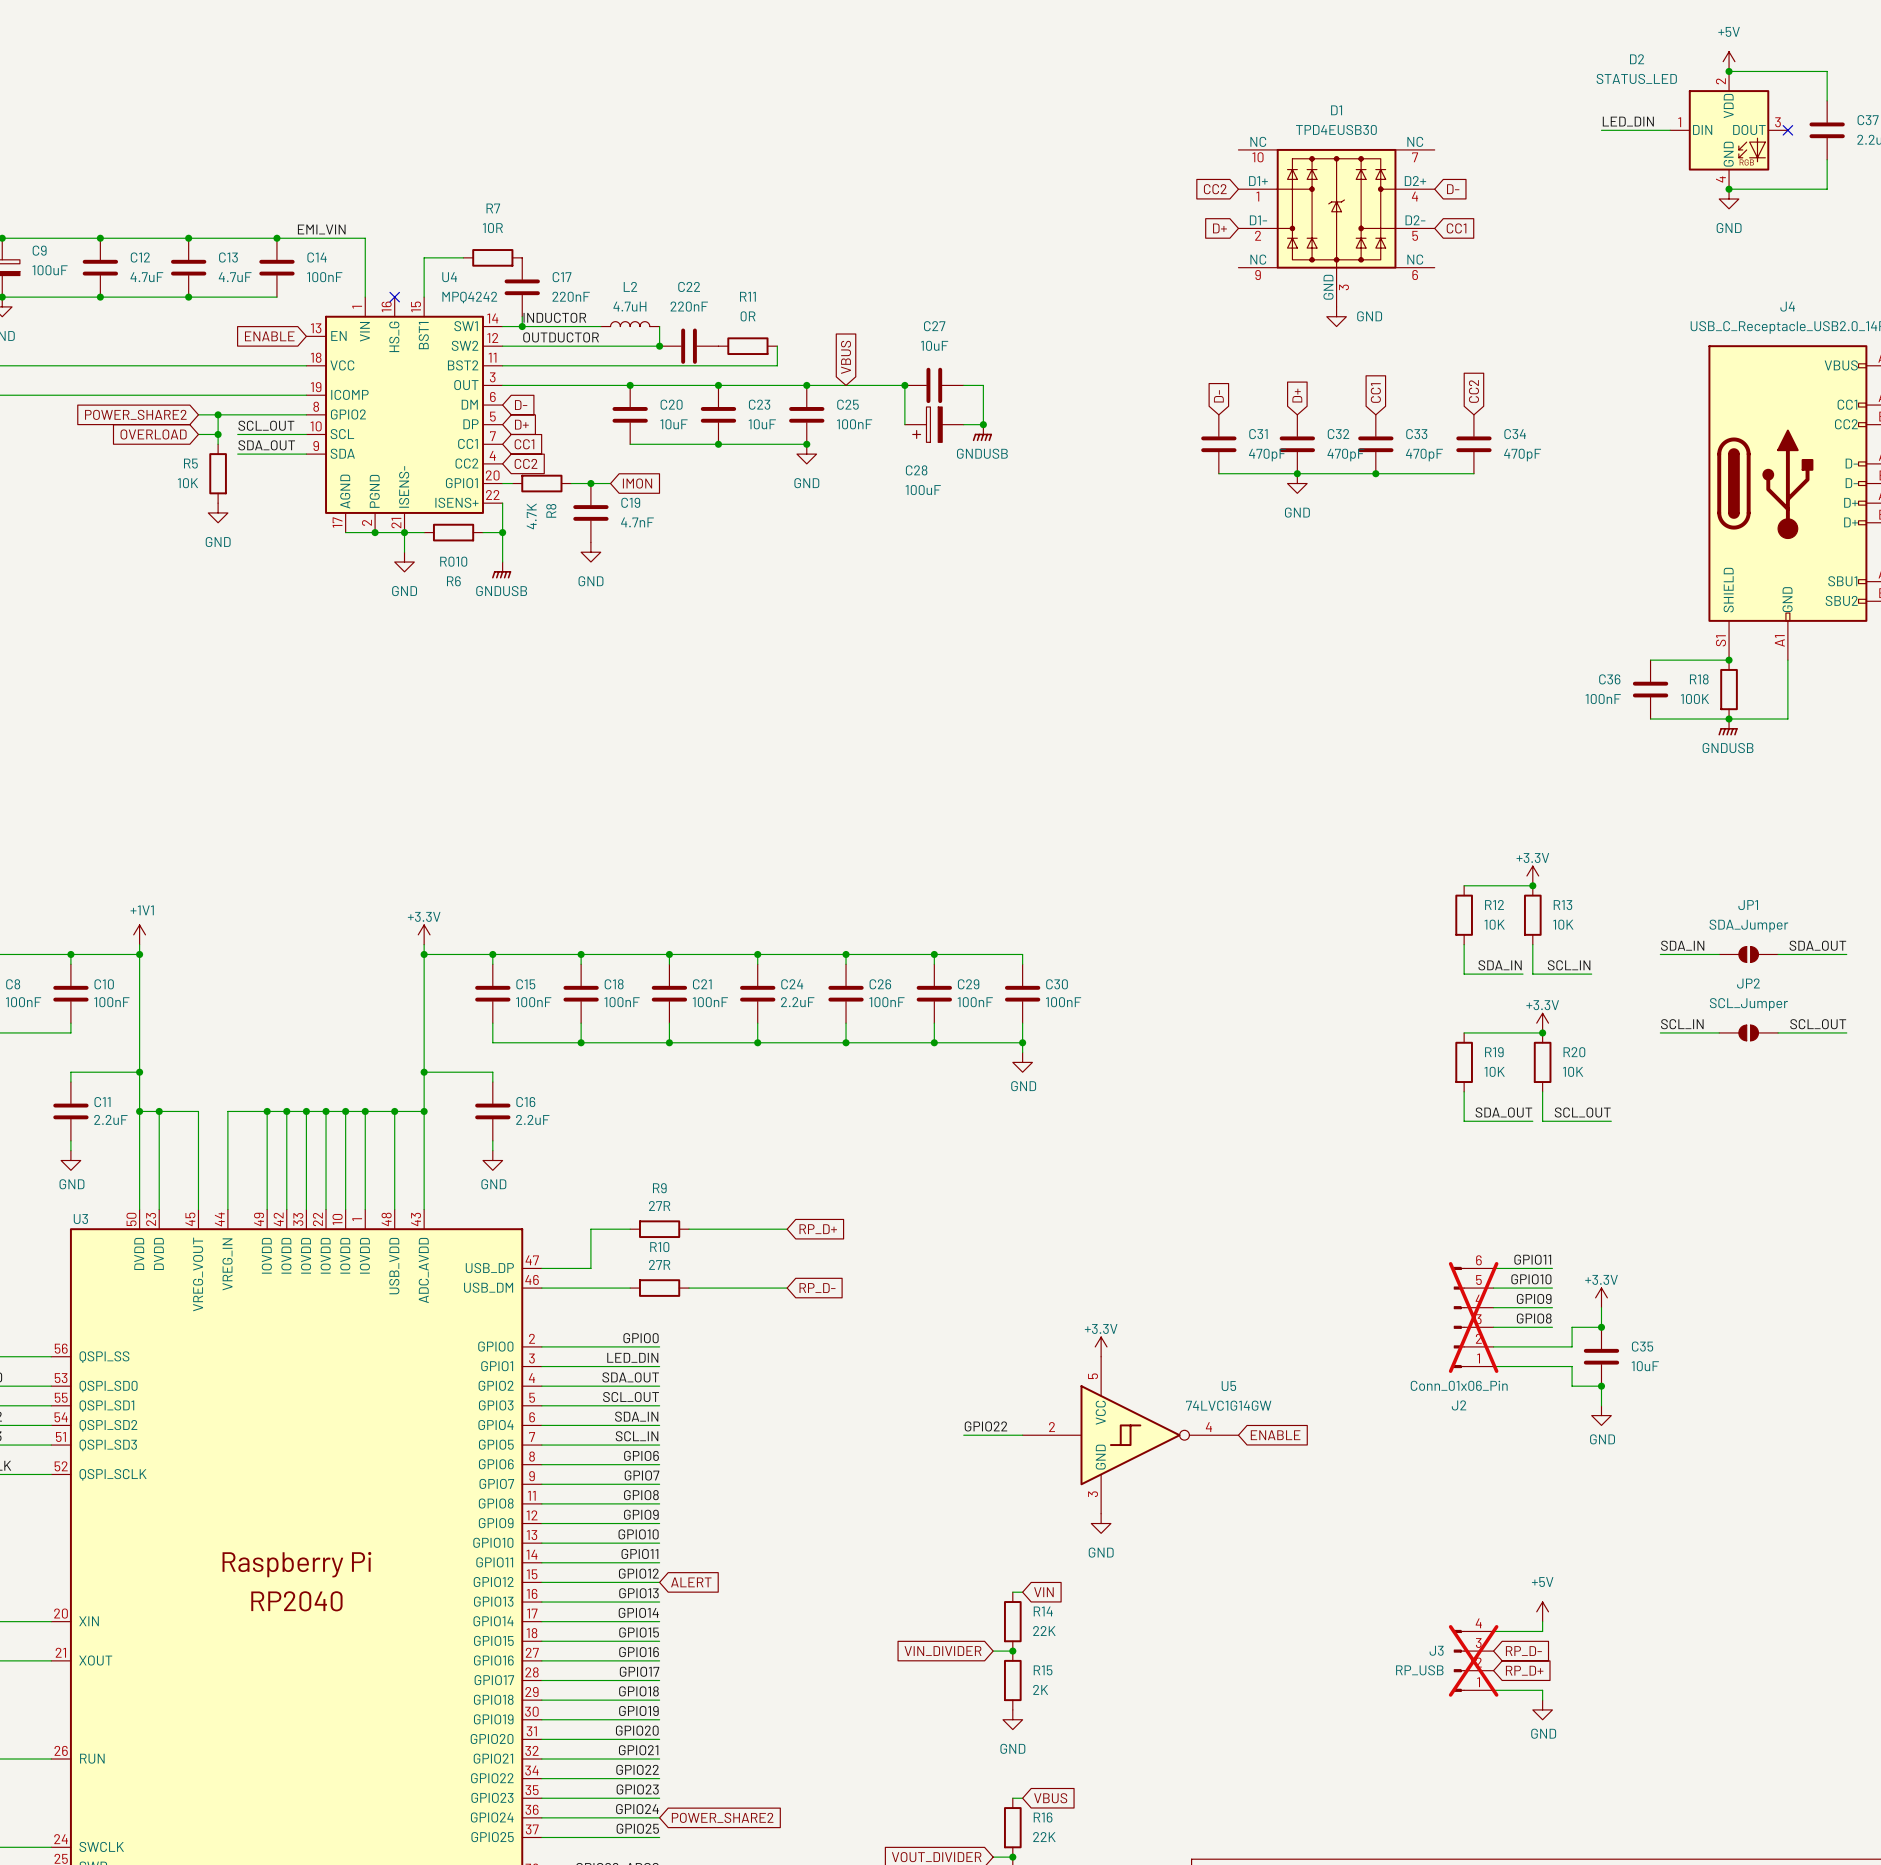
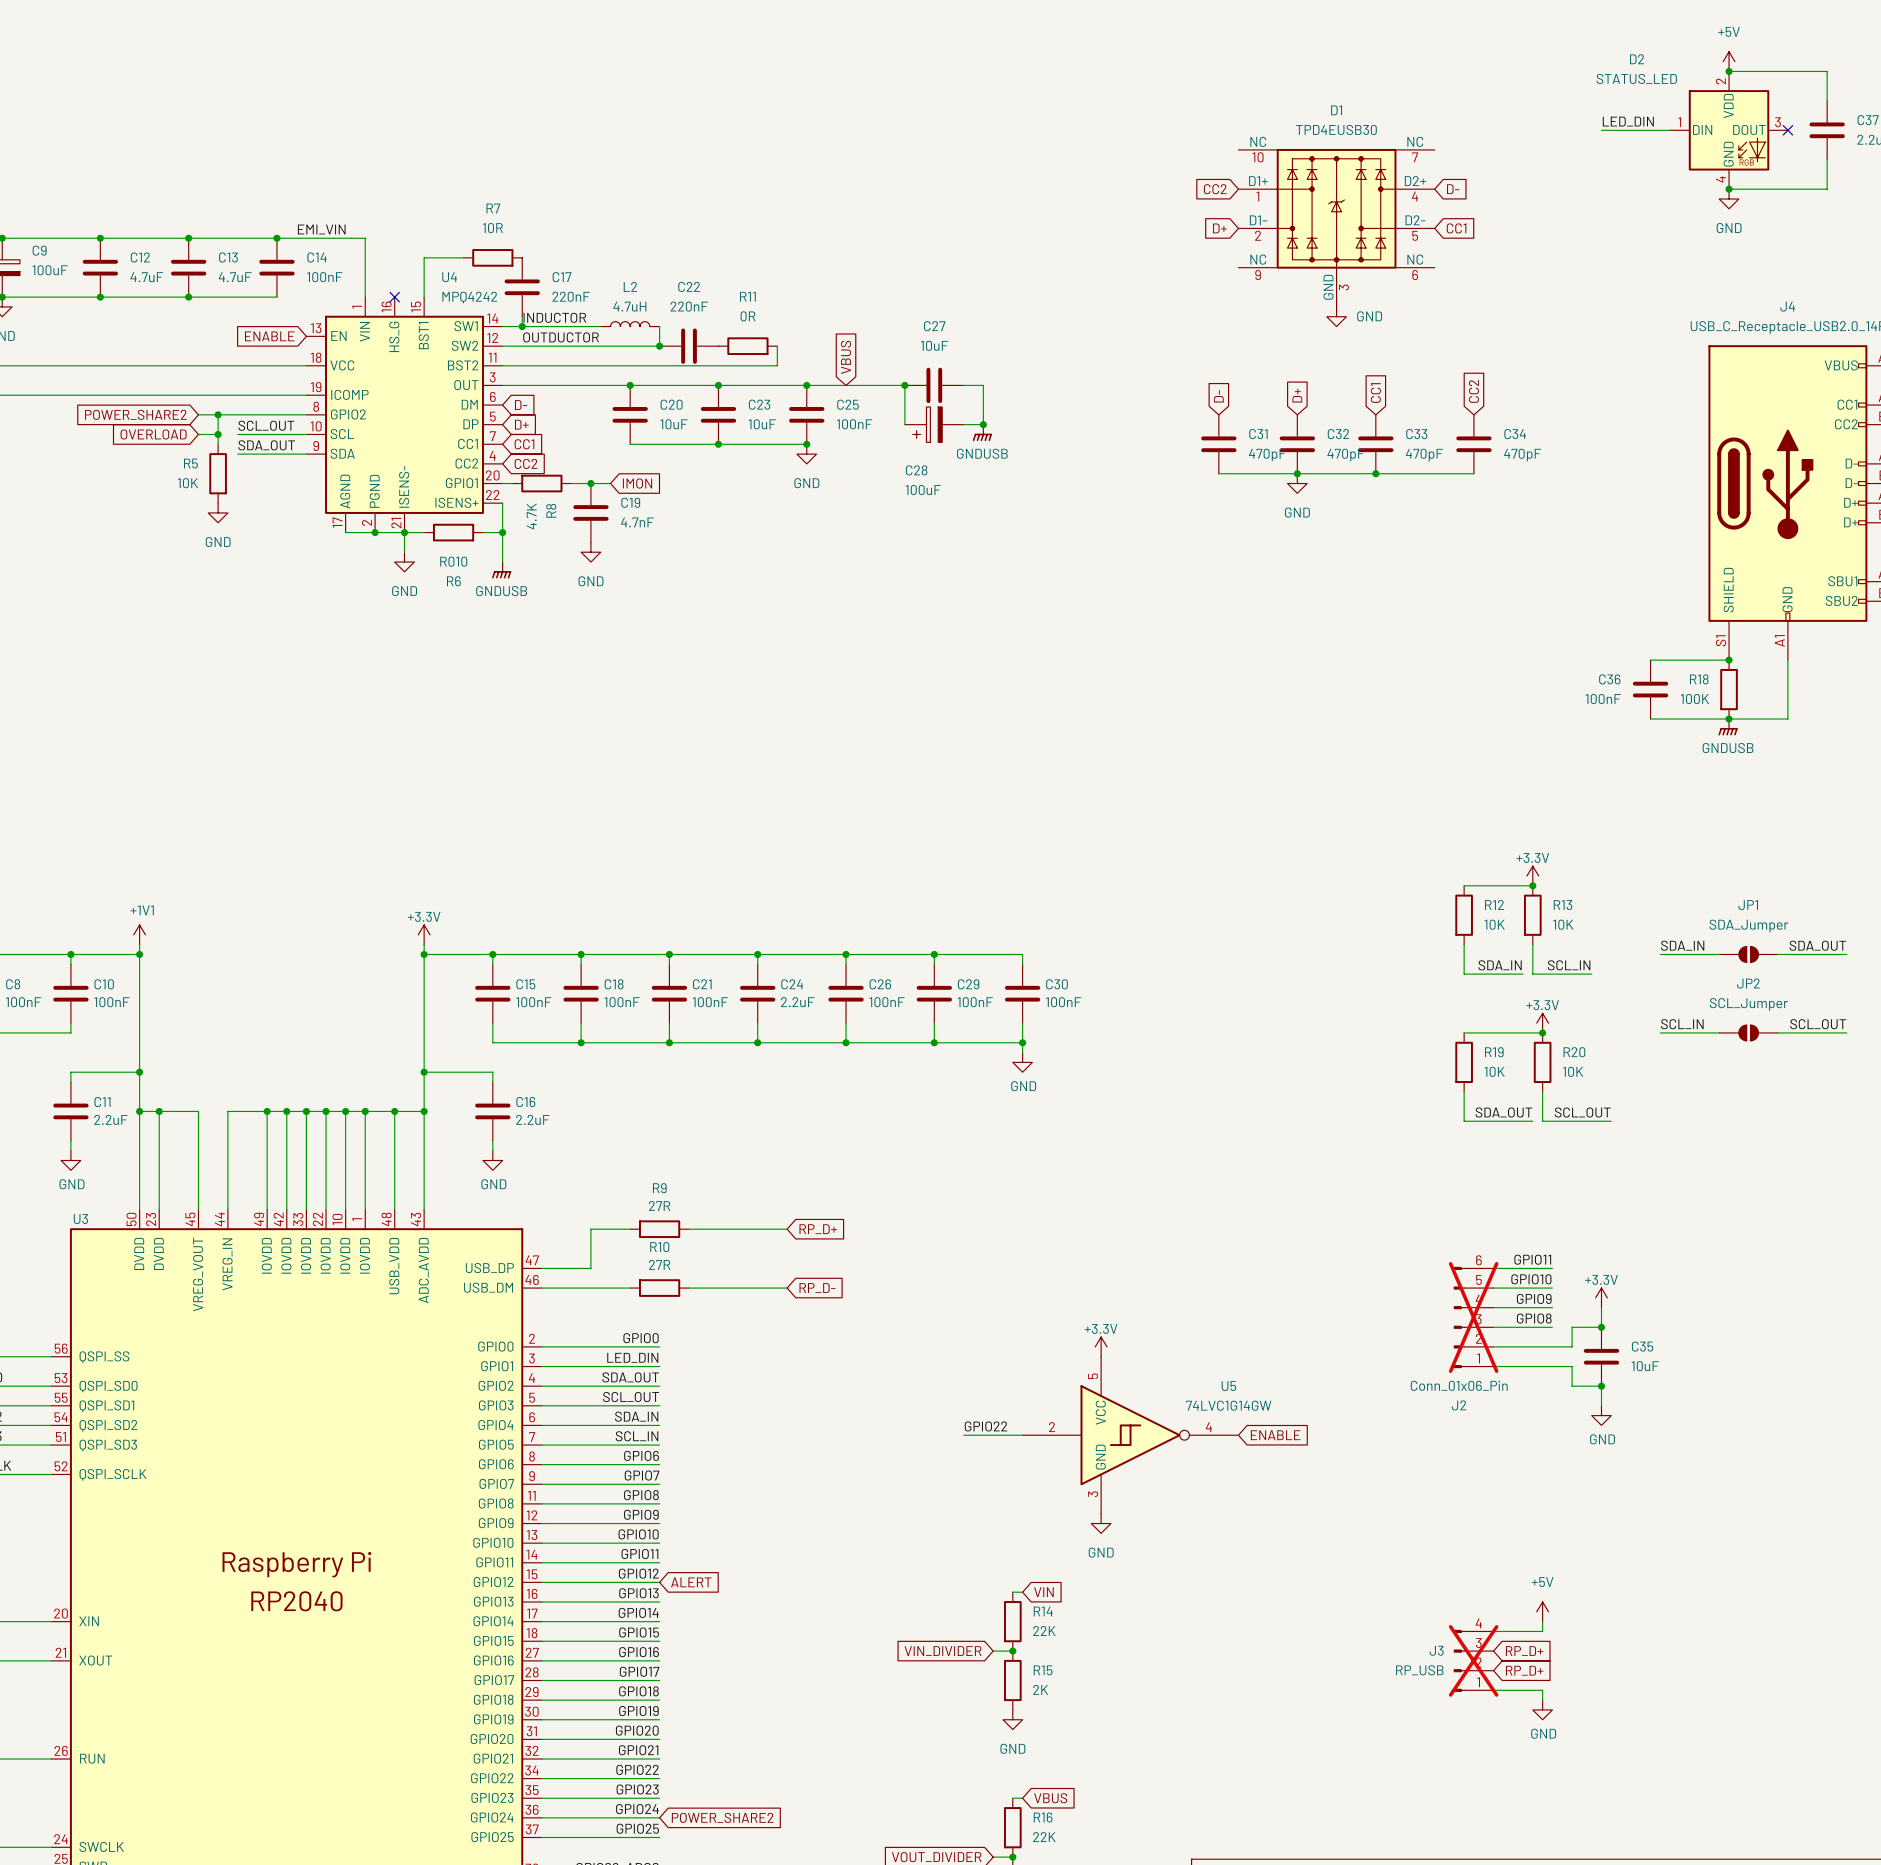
global label: RP_D- (1523, 1651) -> RP_D+ (1524, 1651)

